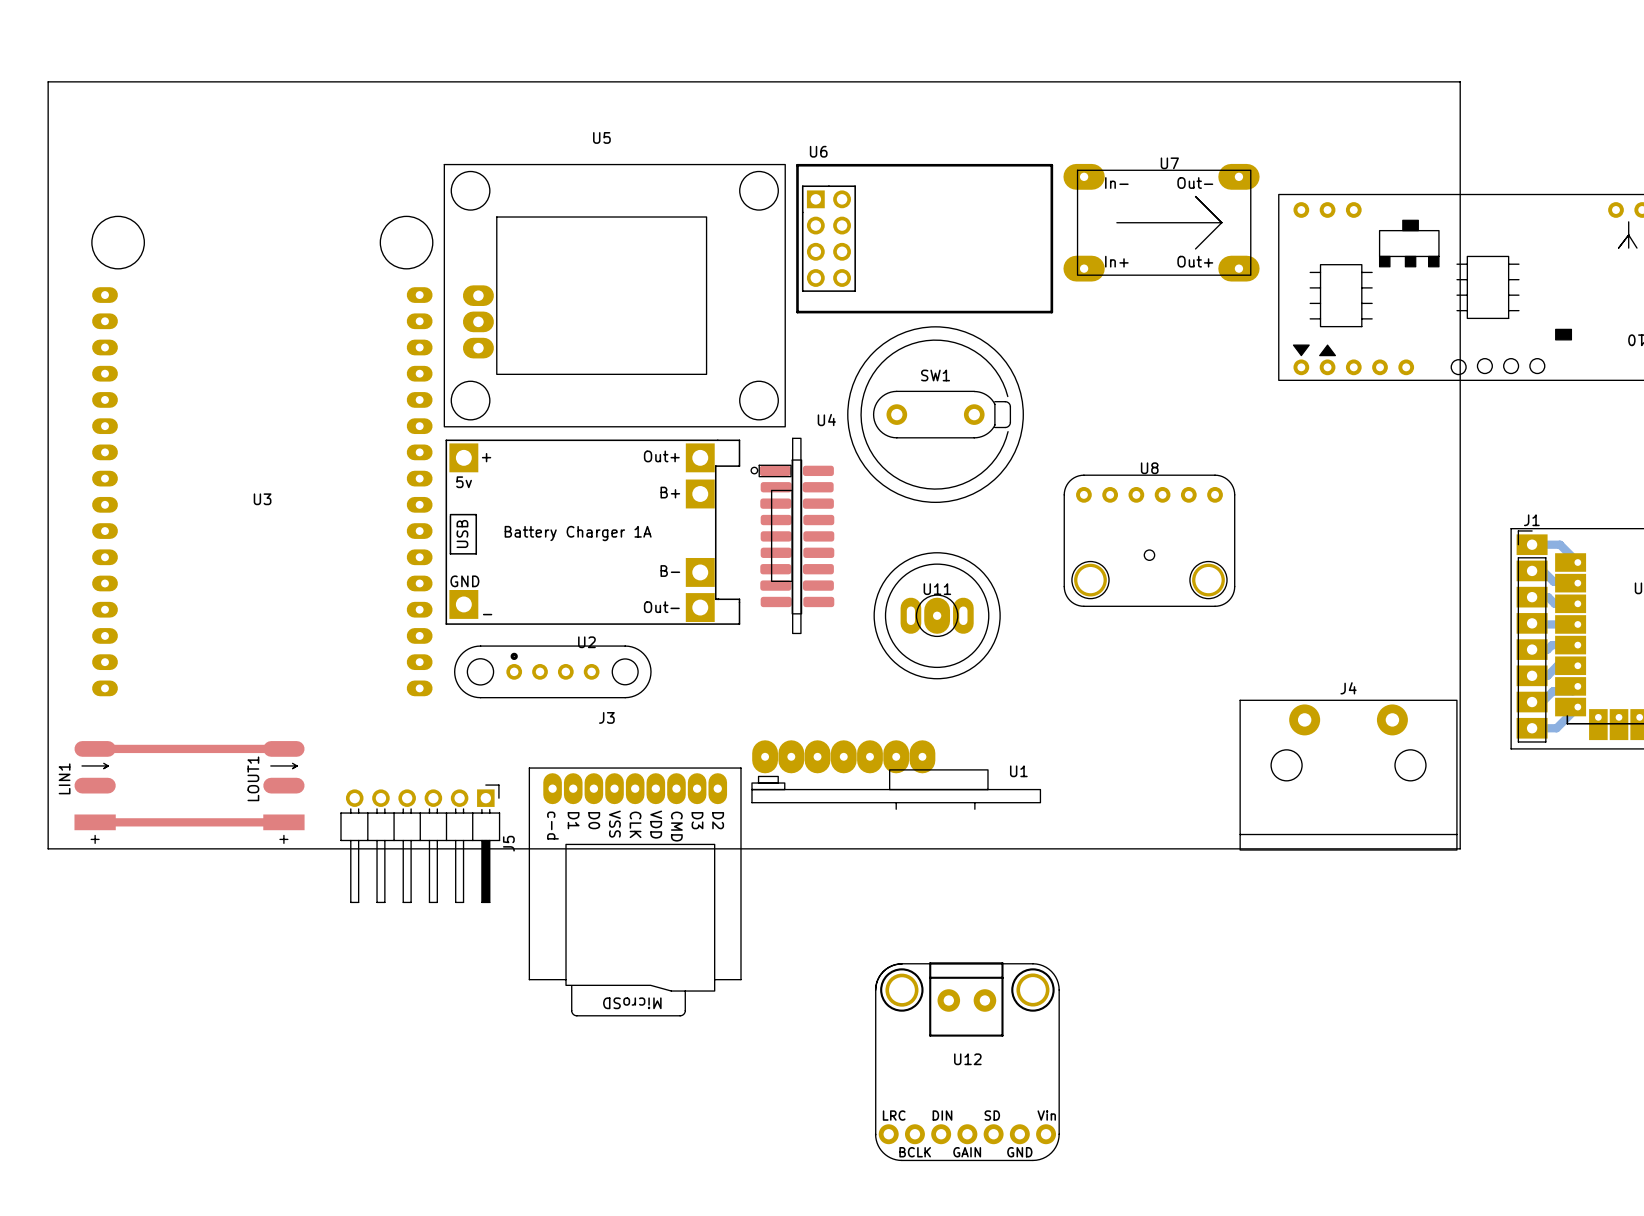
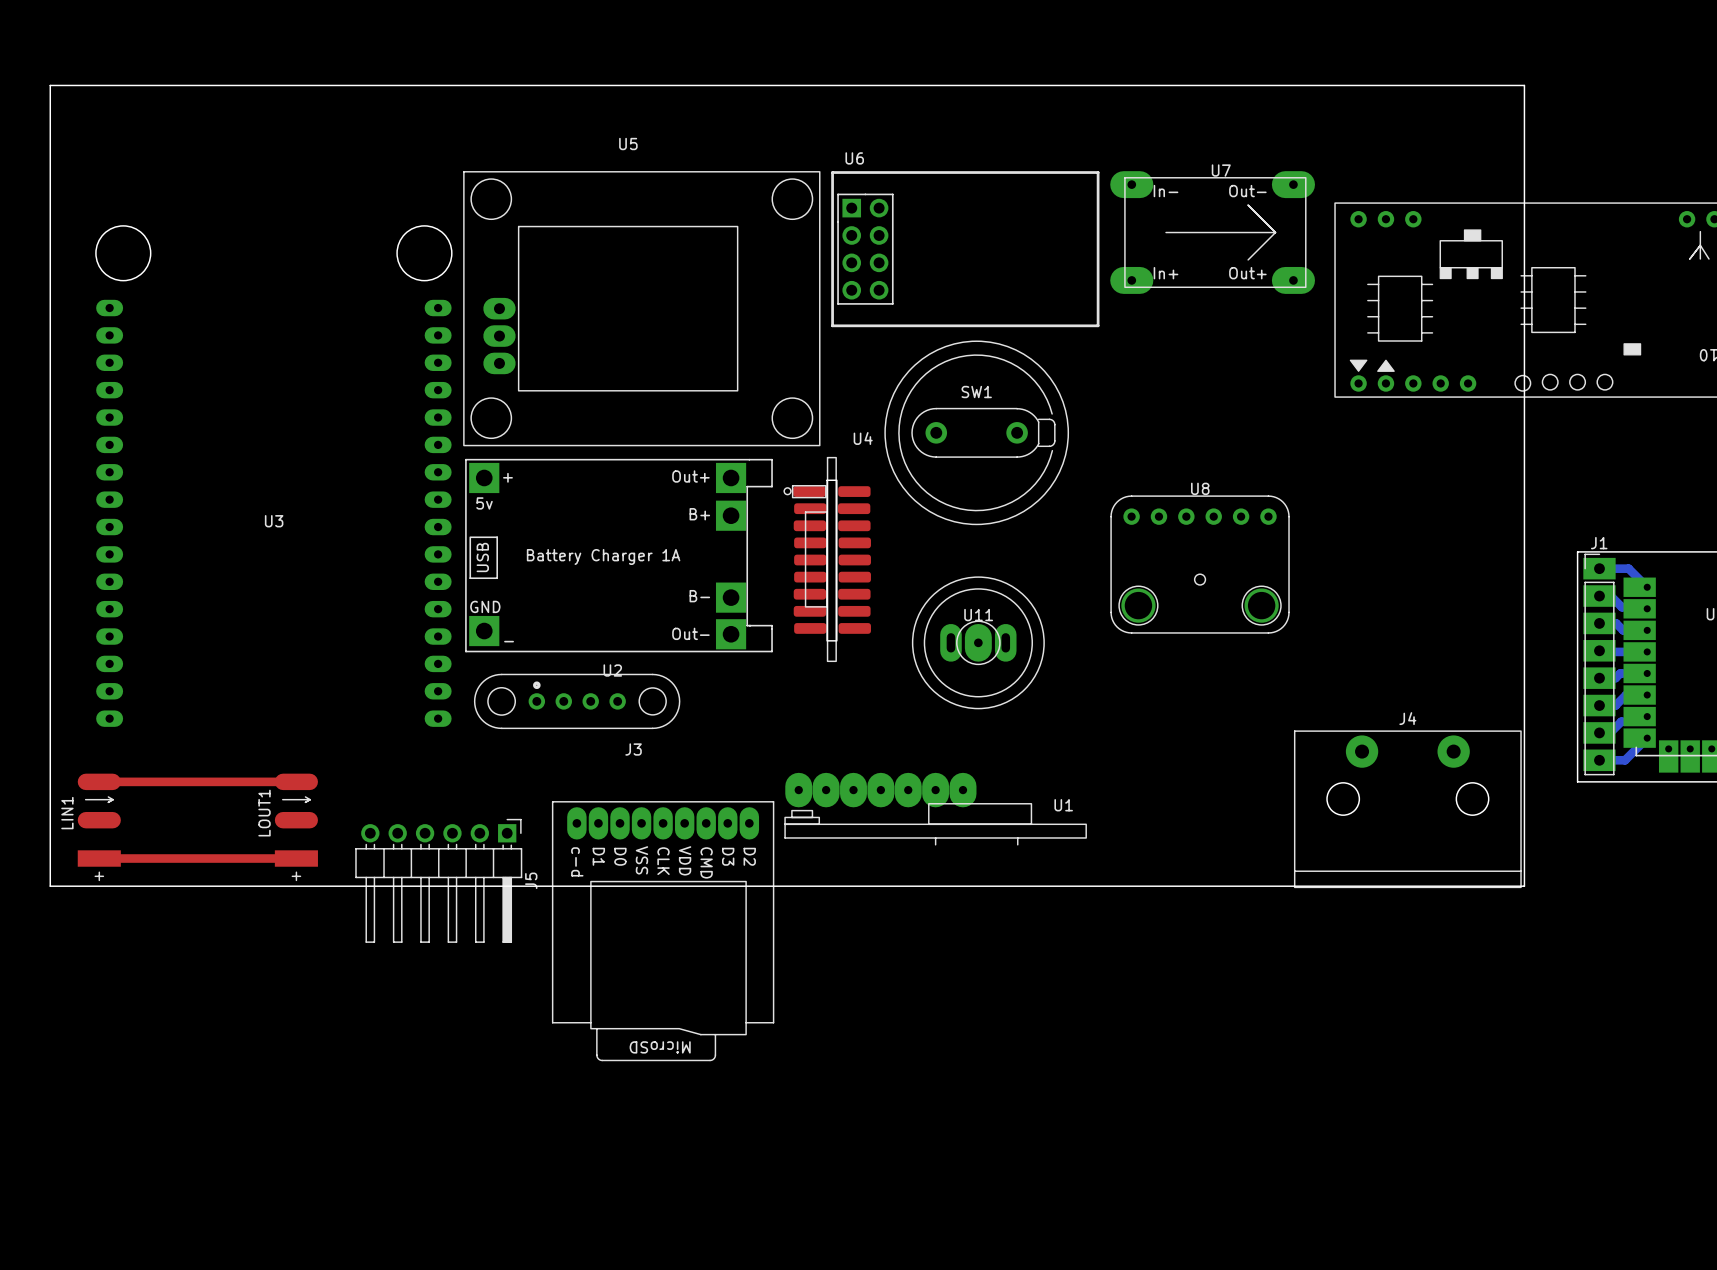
U12: (967, 1061) -> none

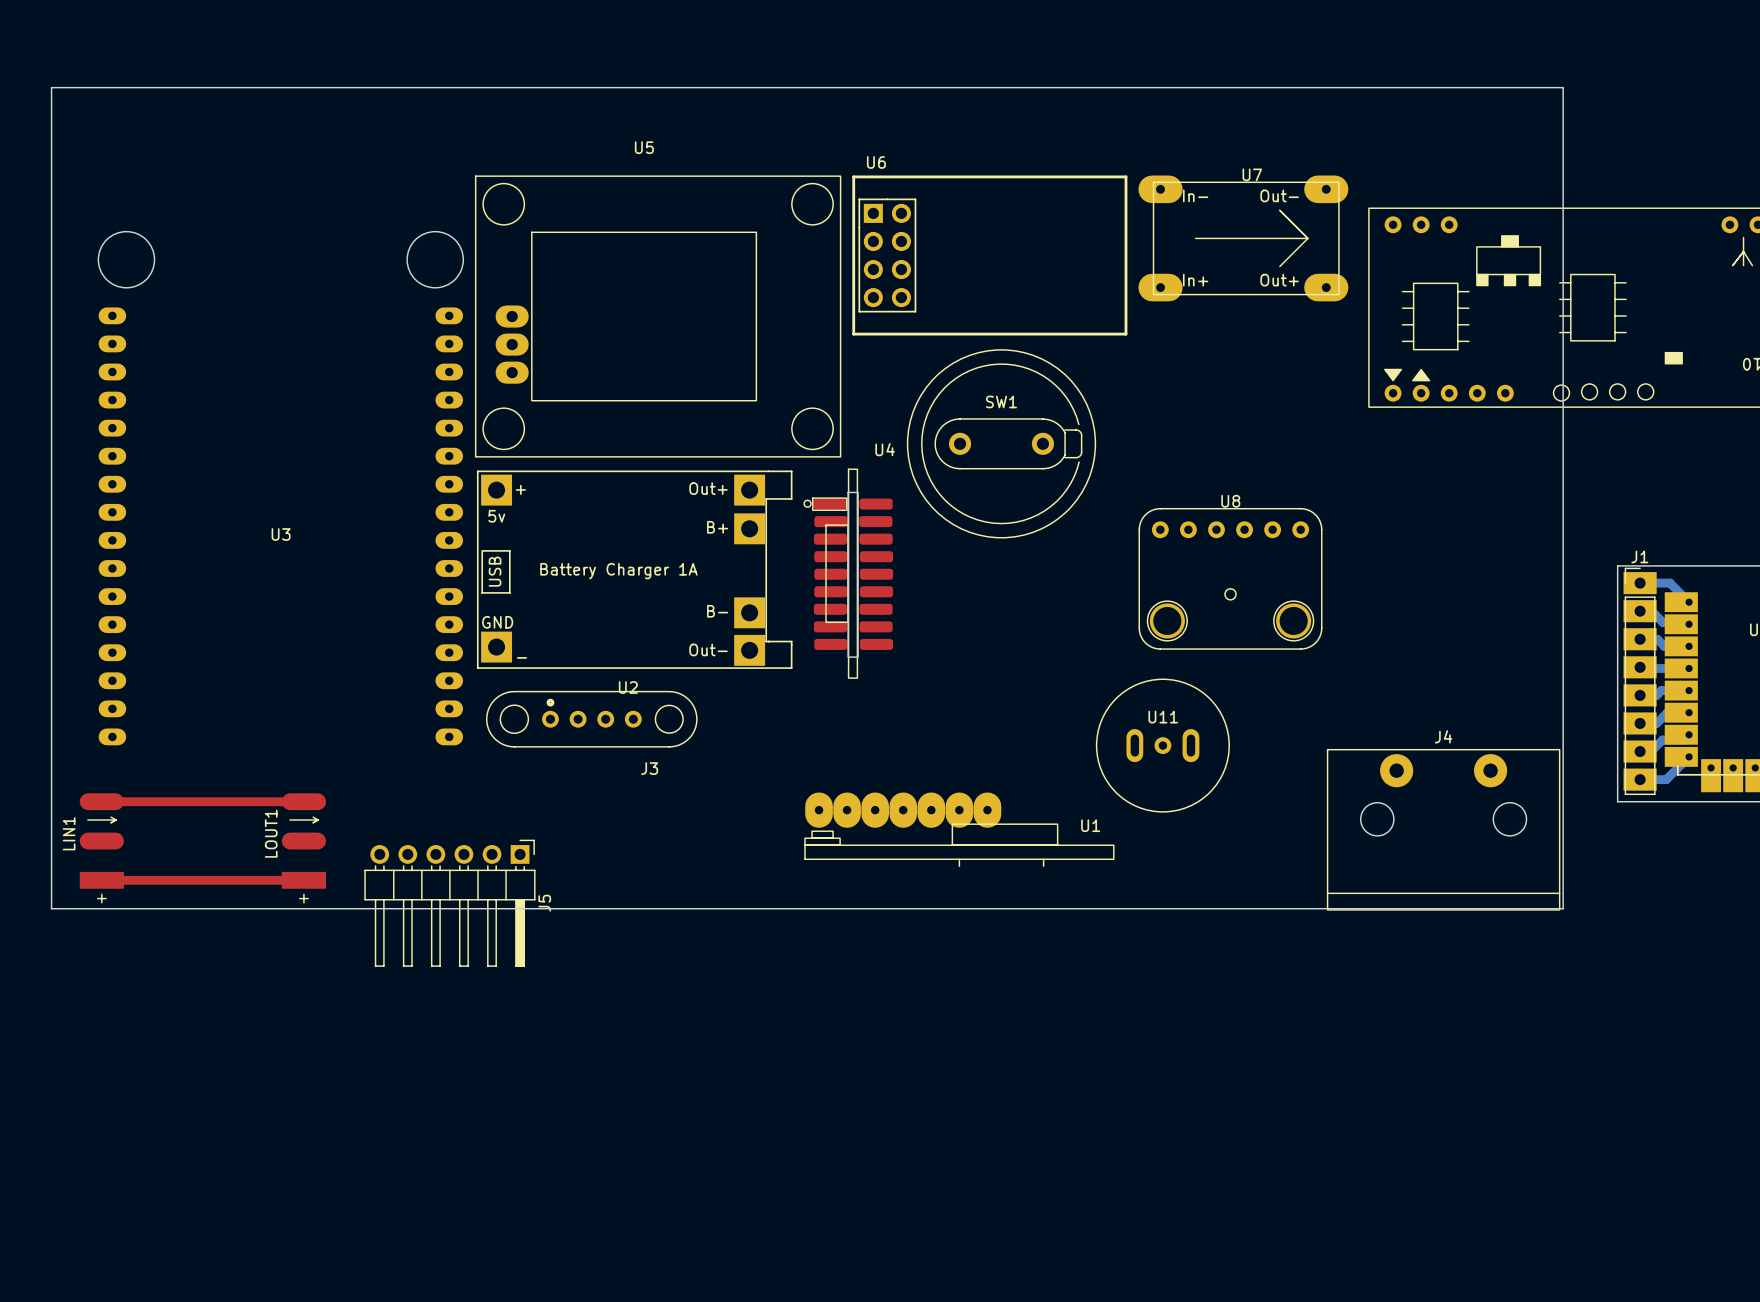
U11 footprint: [911, 576, 1045, 710] -> [1095, 678, 1230, 813]
part: (663, 931) -> none

